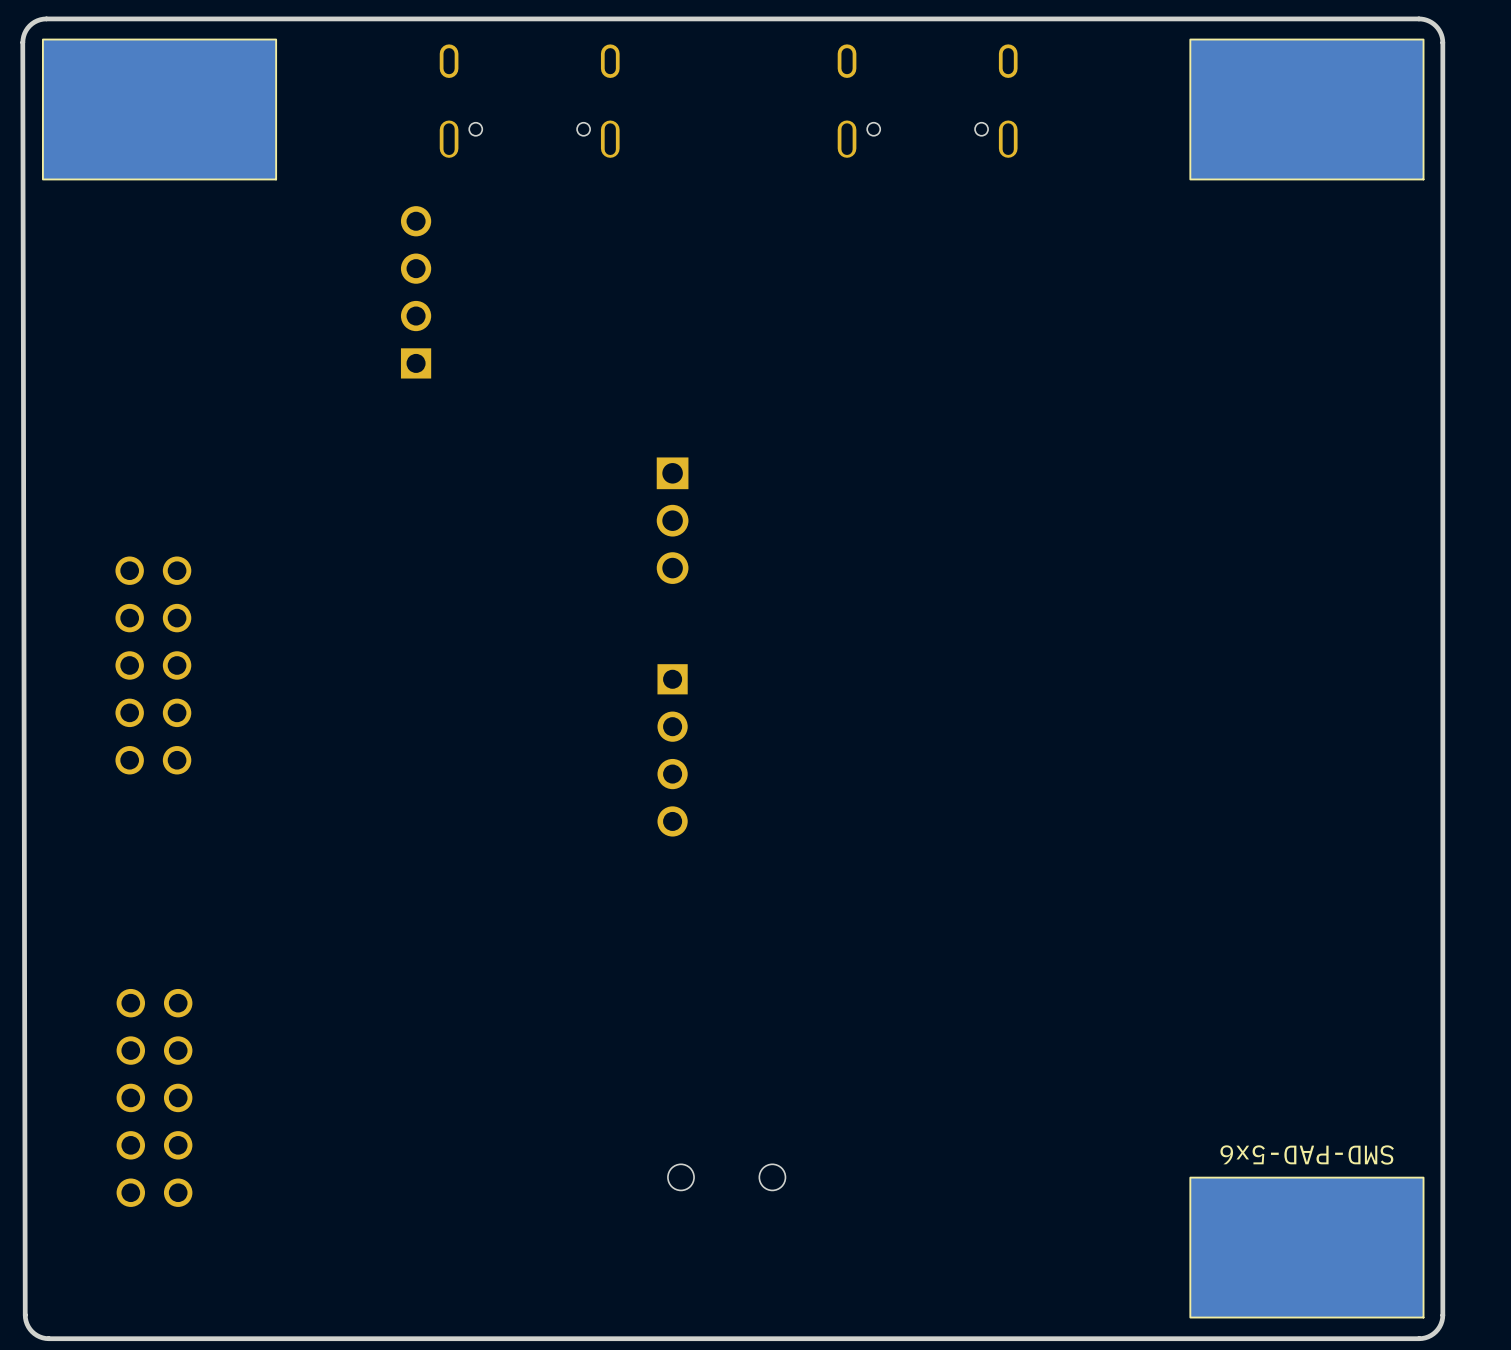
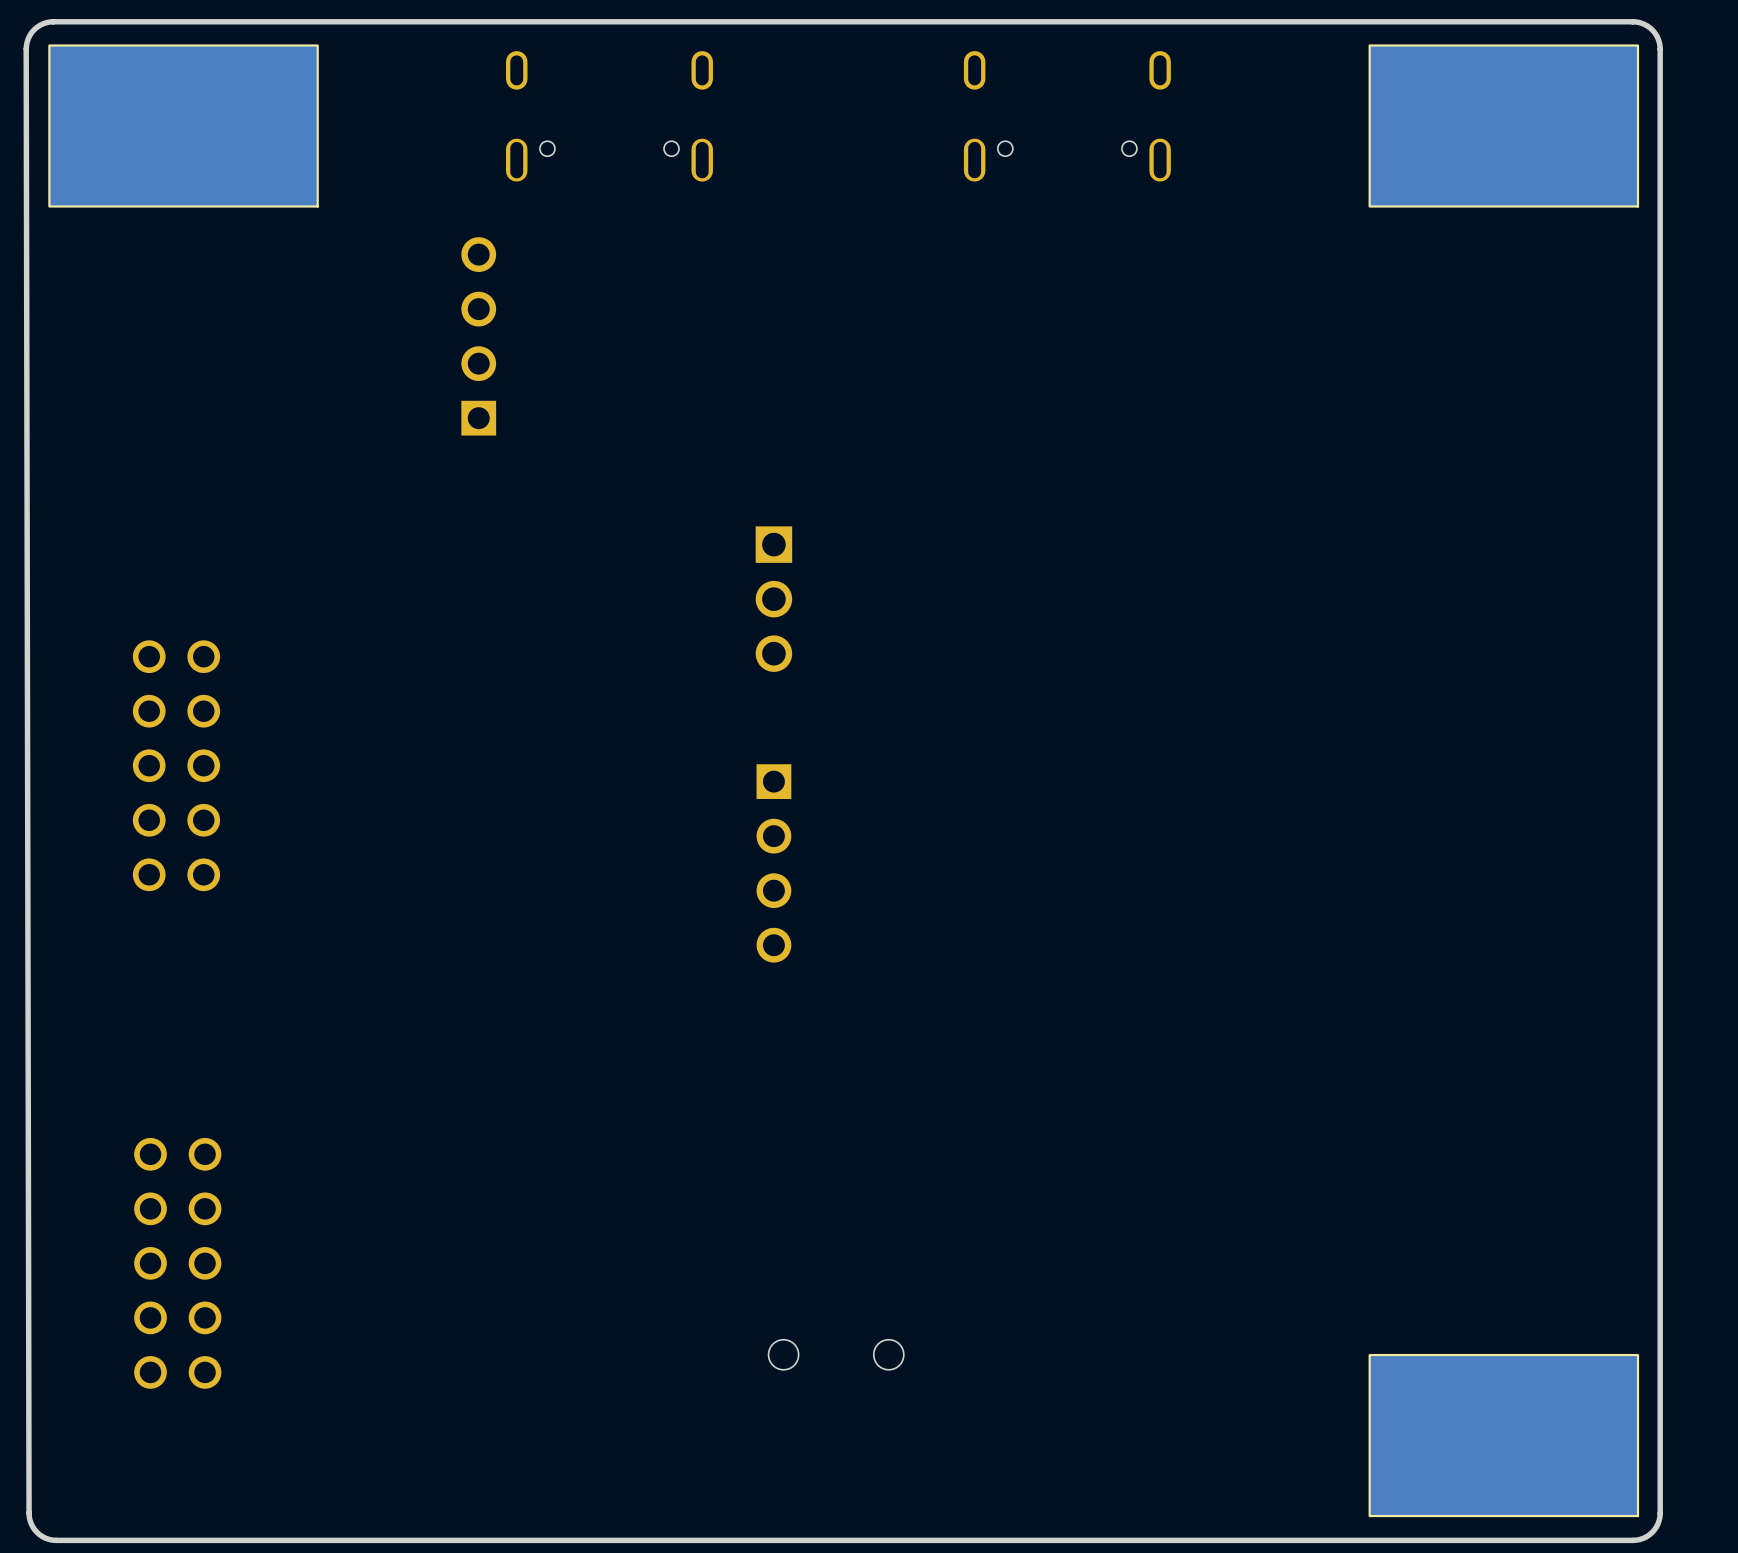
SMD-PAD-5x6 name: SMD-PAD-5x6 (1307, 1154) -> none

